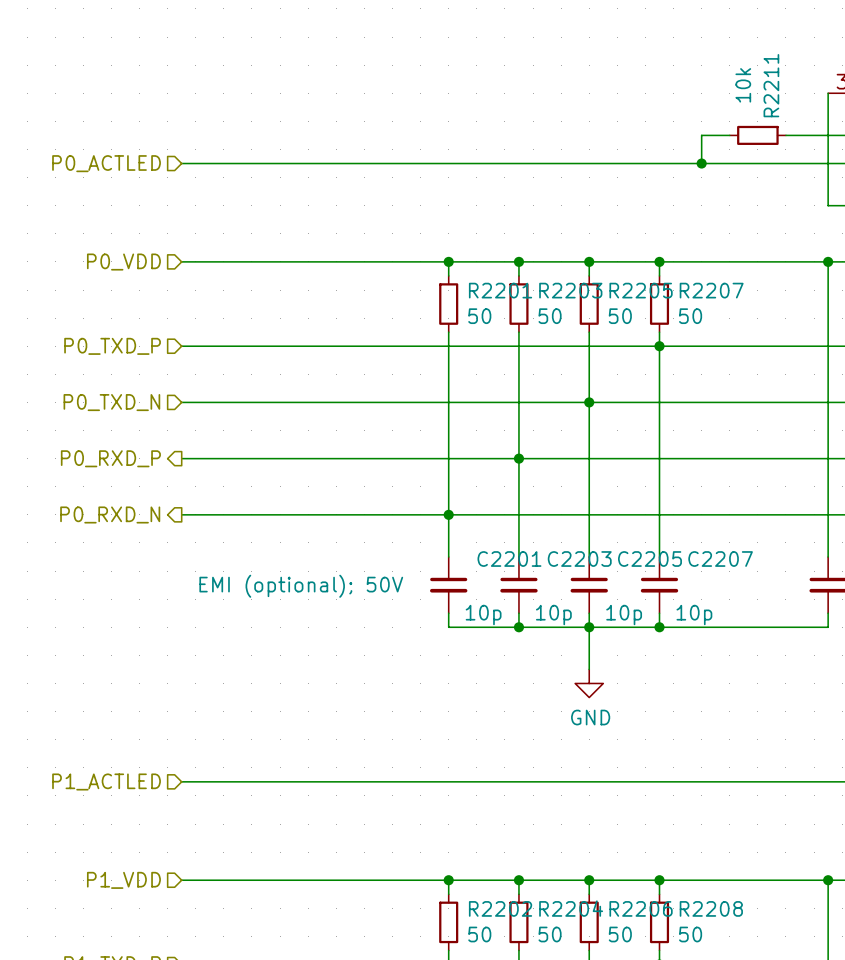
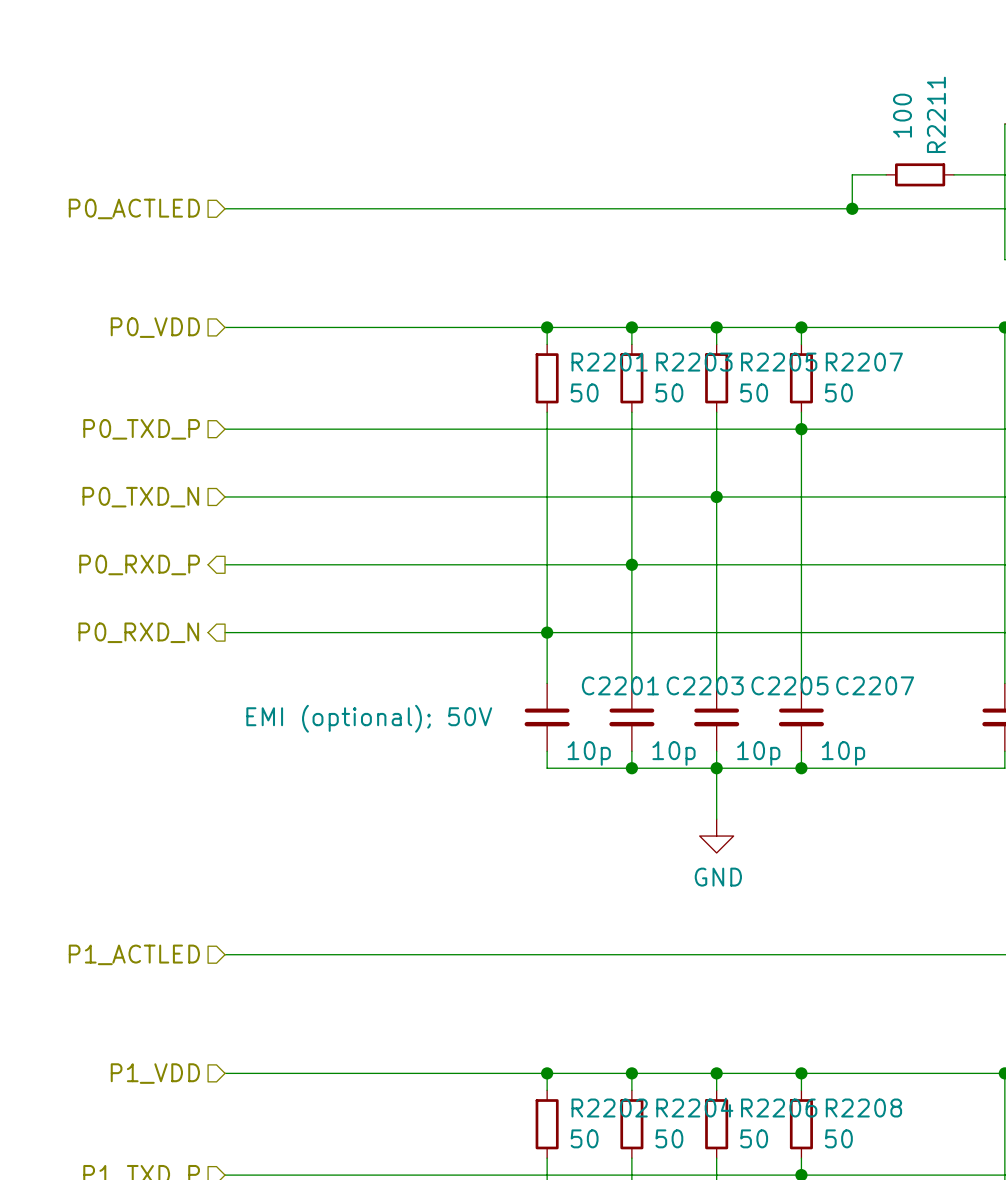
R2211 value: 10k (743, 85) -> 100 (902, 115)

